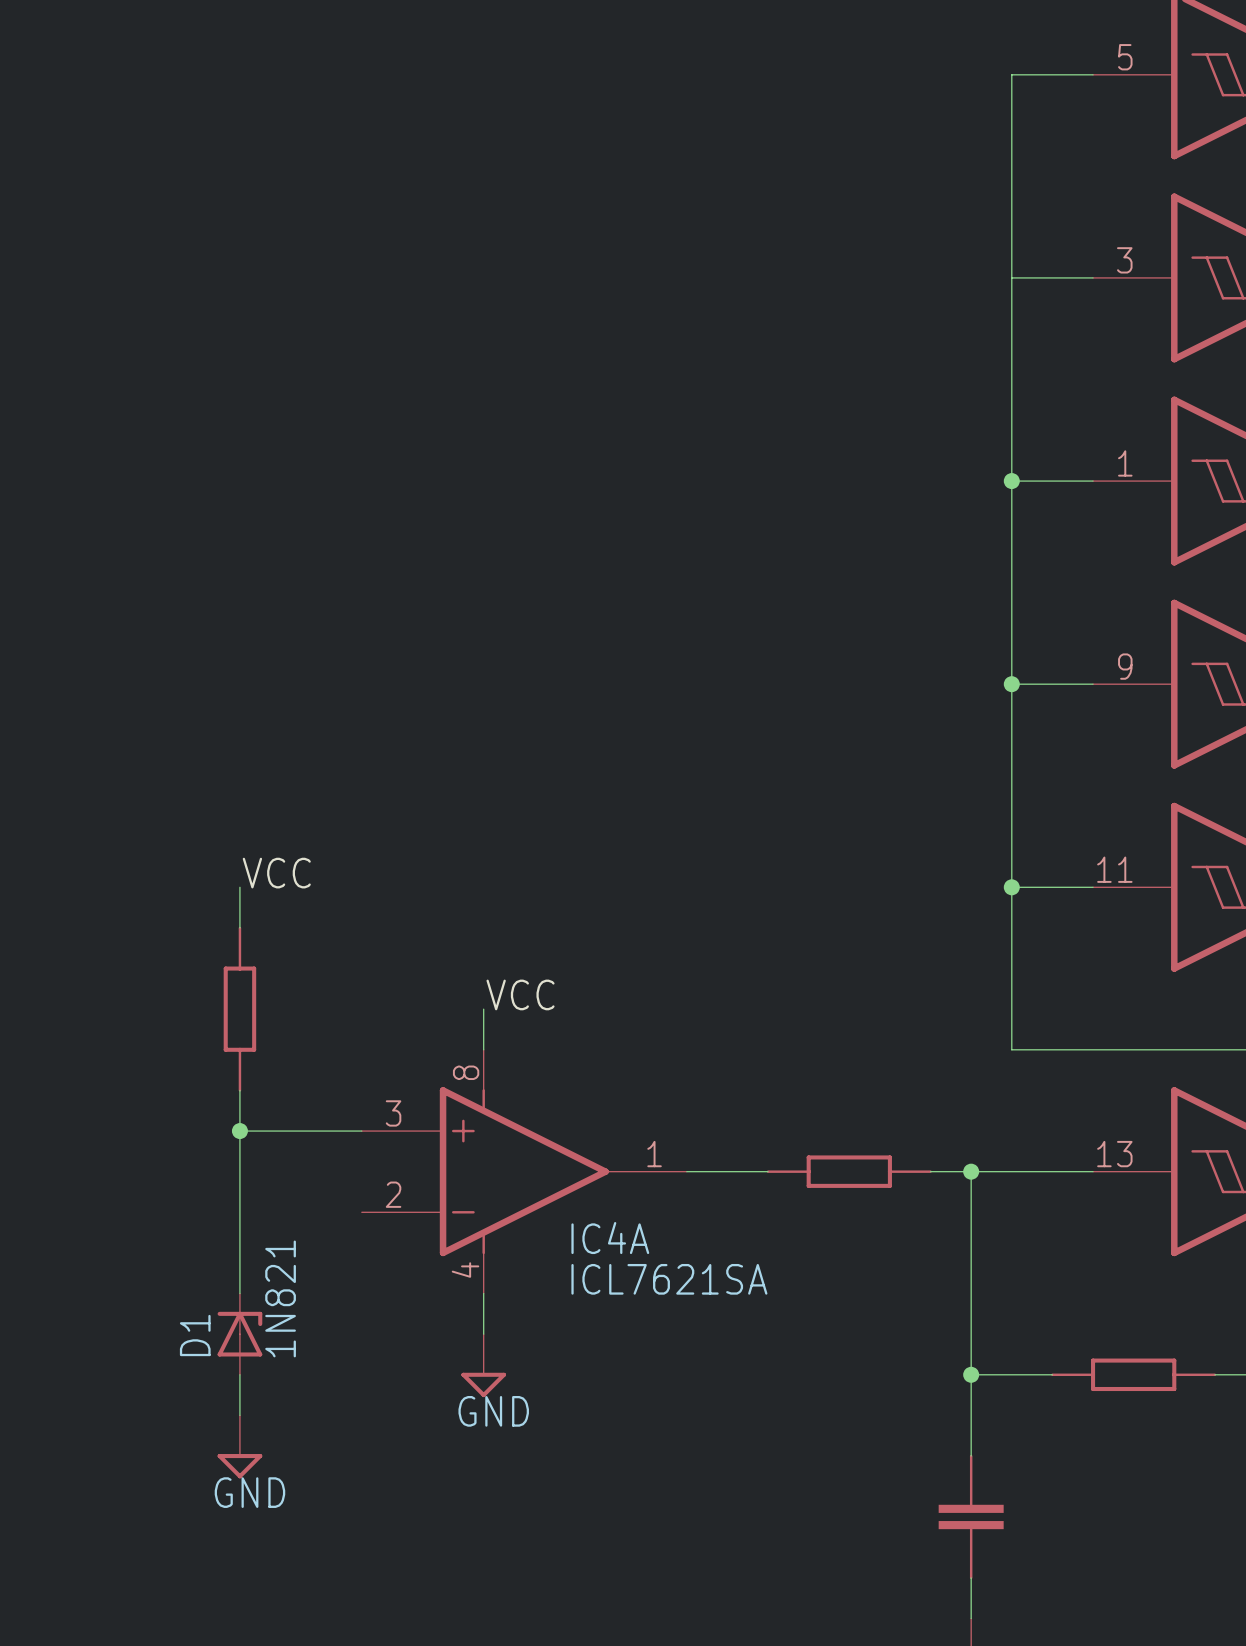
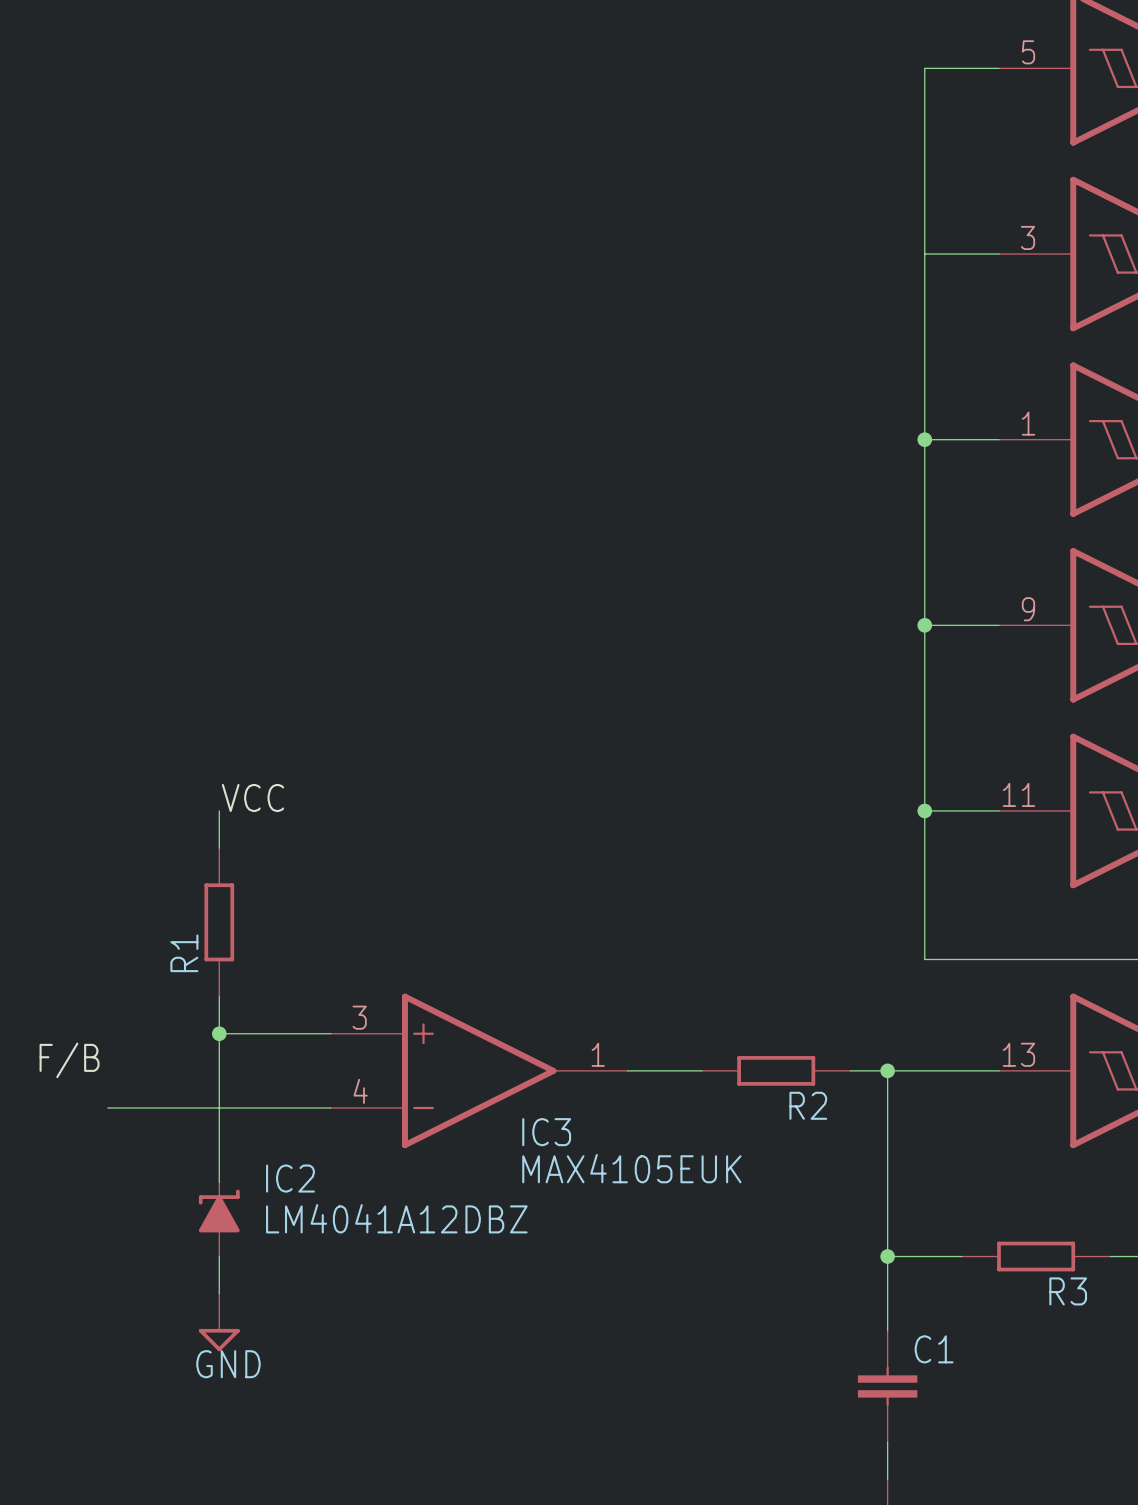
label: VCC (520, 994) -> none
part: (239, 1009) -> none
R1: none -> (219, 922)
wire: (483, 1009) (483, 1049) -> none
label: none -> F/B (69, 1060)
IC4A: ICL7621SA (524, 1171) -> none
IC3: none -> MAX4105EUK (479, 1070)
part: (849, 1171) -> none
R2: none -> (776, 1070)
wire: none -> (107, 1108) (330, 1108)
wire: (483, 1293) (483, 1334) -> none
D1: 1N821 (239, 1334) -> none
IC2: none -> LM4041A12DBZ (219, 1219)
power symbol: GND (483, 1365) -> none
part: (1133, 1374) -> none
R3: none -> (1036, 1256)
part: (971, 1516) -> none
C1: none -> (887, 1386)

